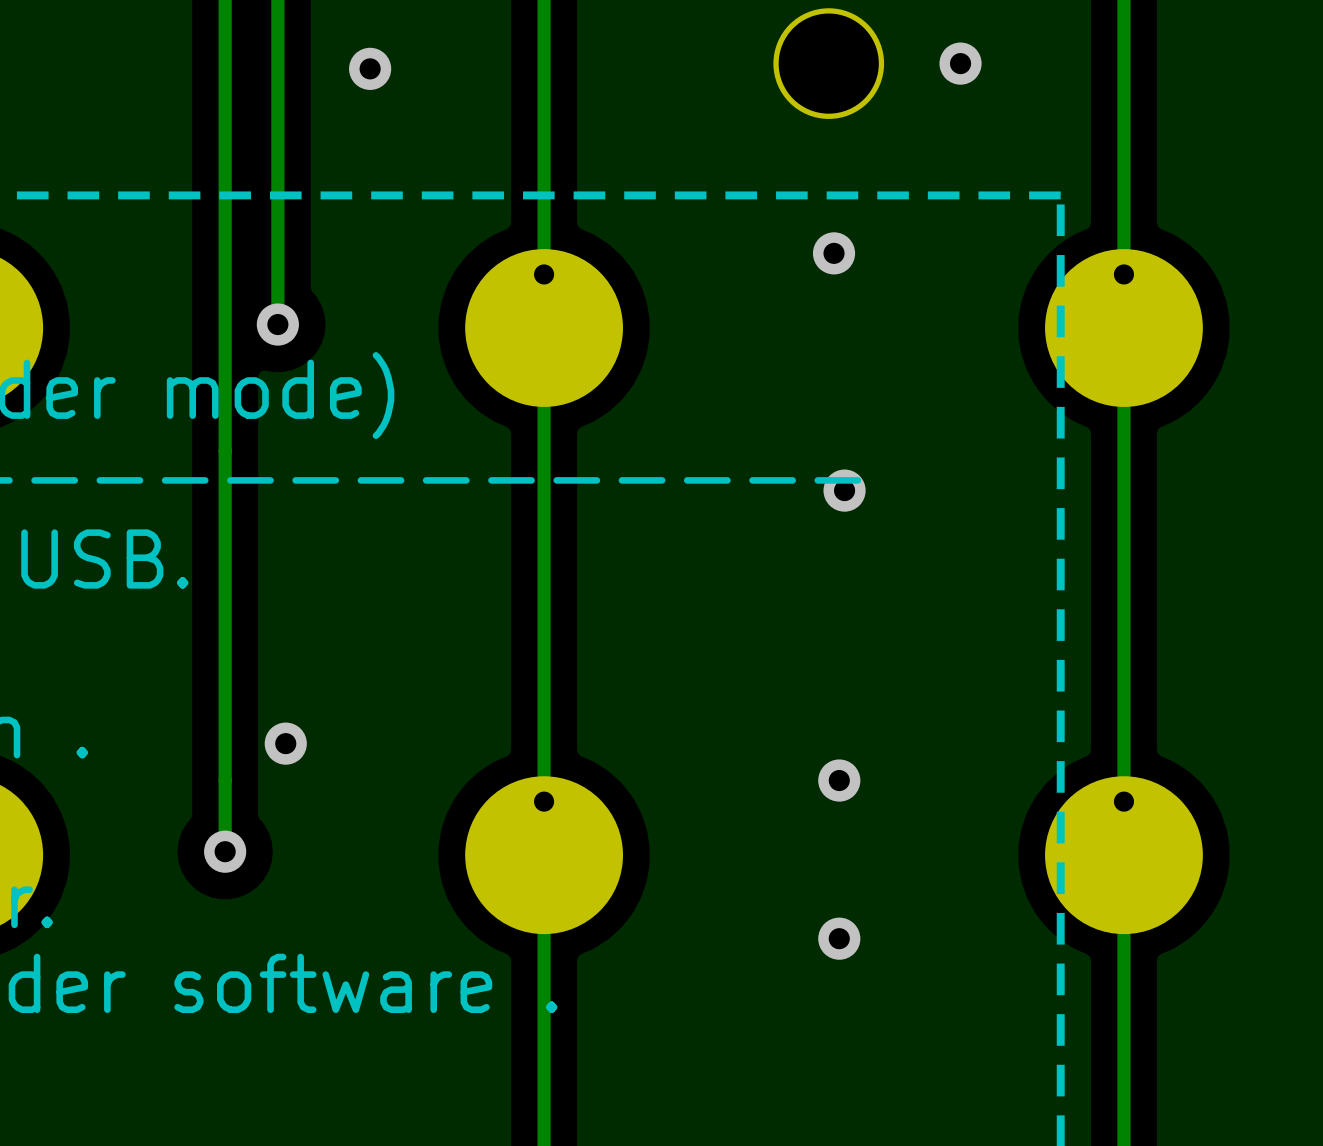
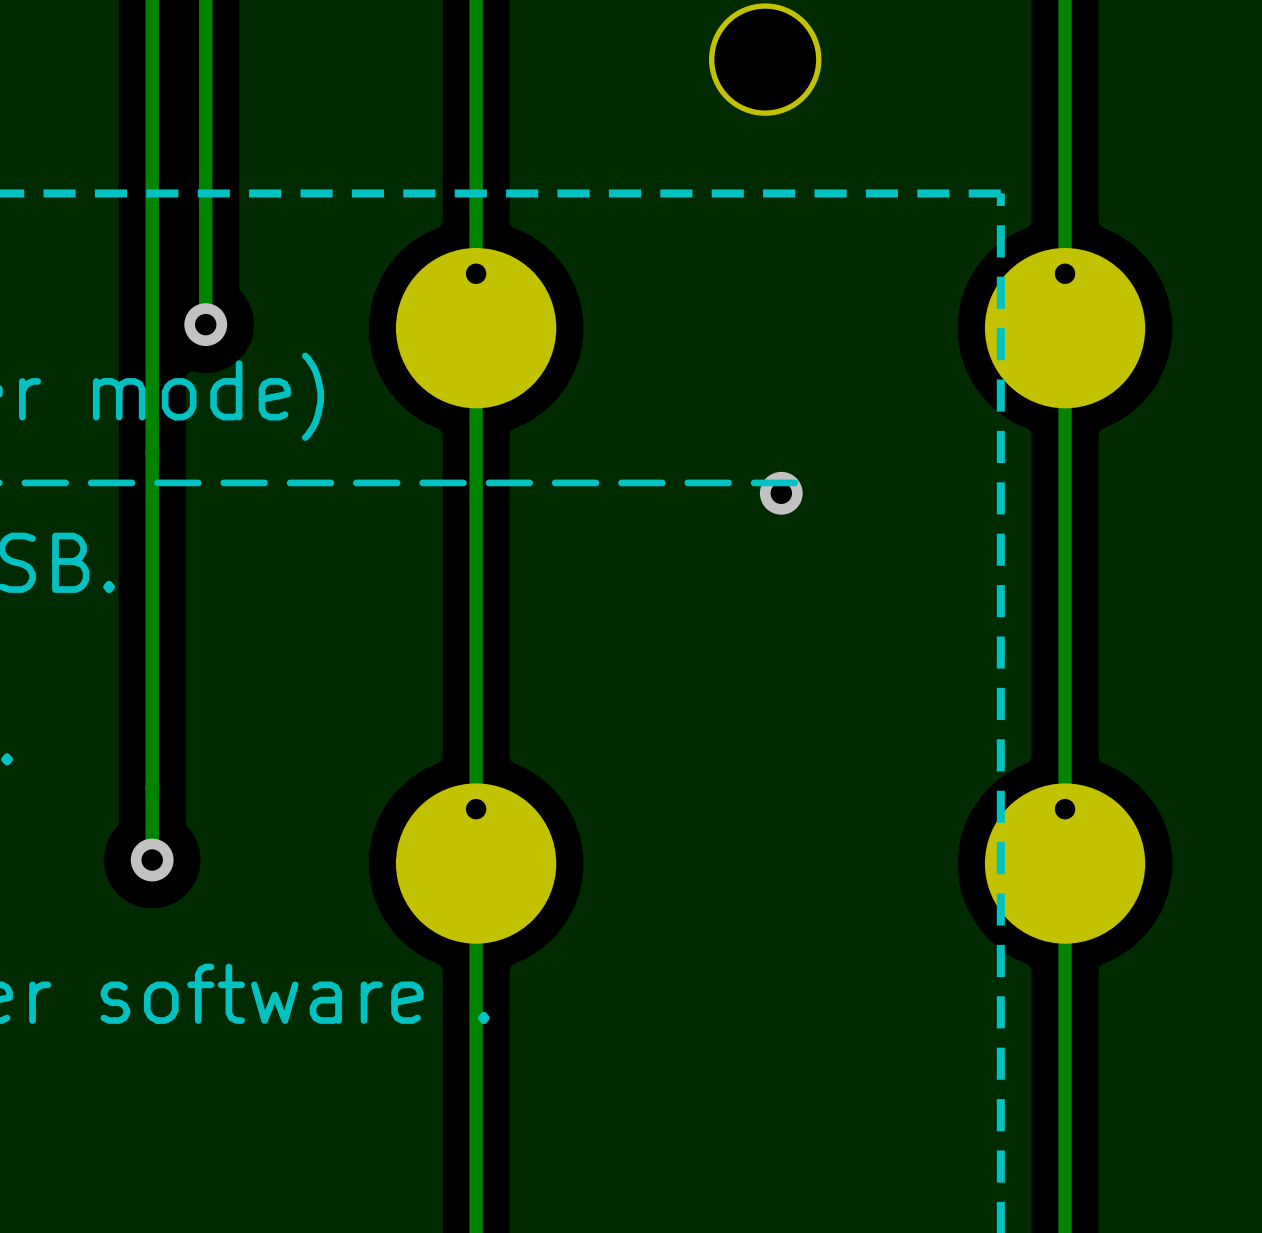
via: (960, 63) -> none
via: (370, 68) -> none
via: (834, 253) -> none
via: (285, 743) -> none
via: (839, 780) -> none
via: (839, 938) -> none

